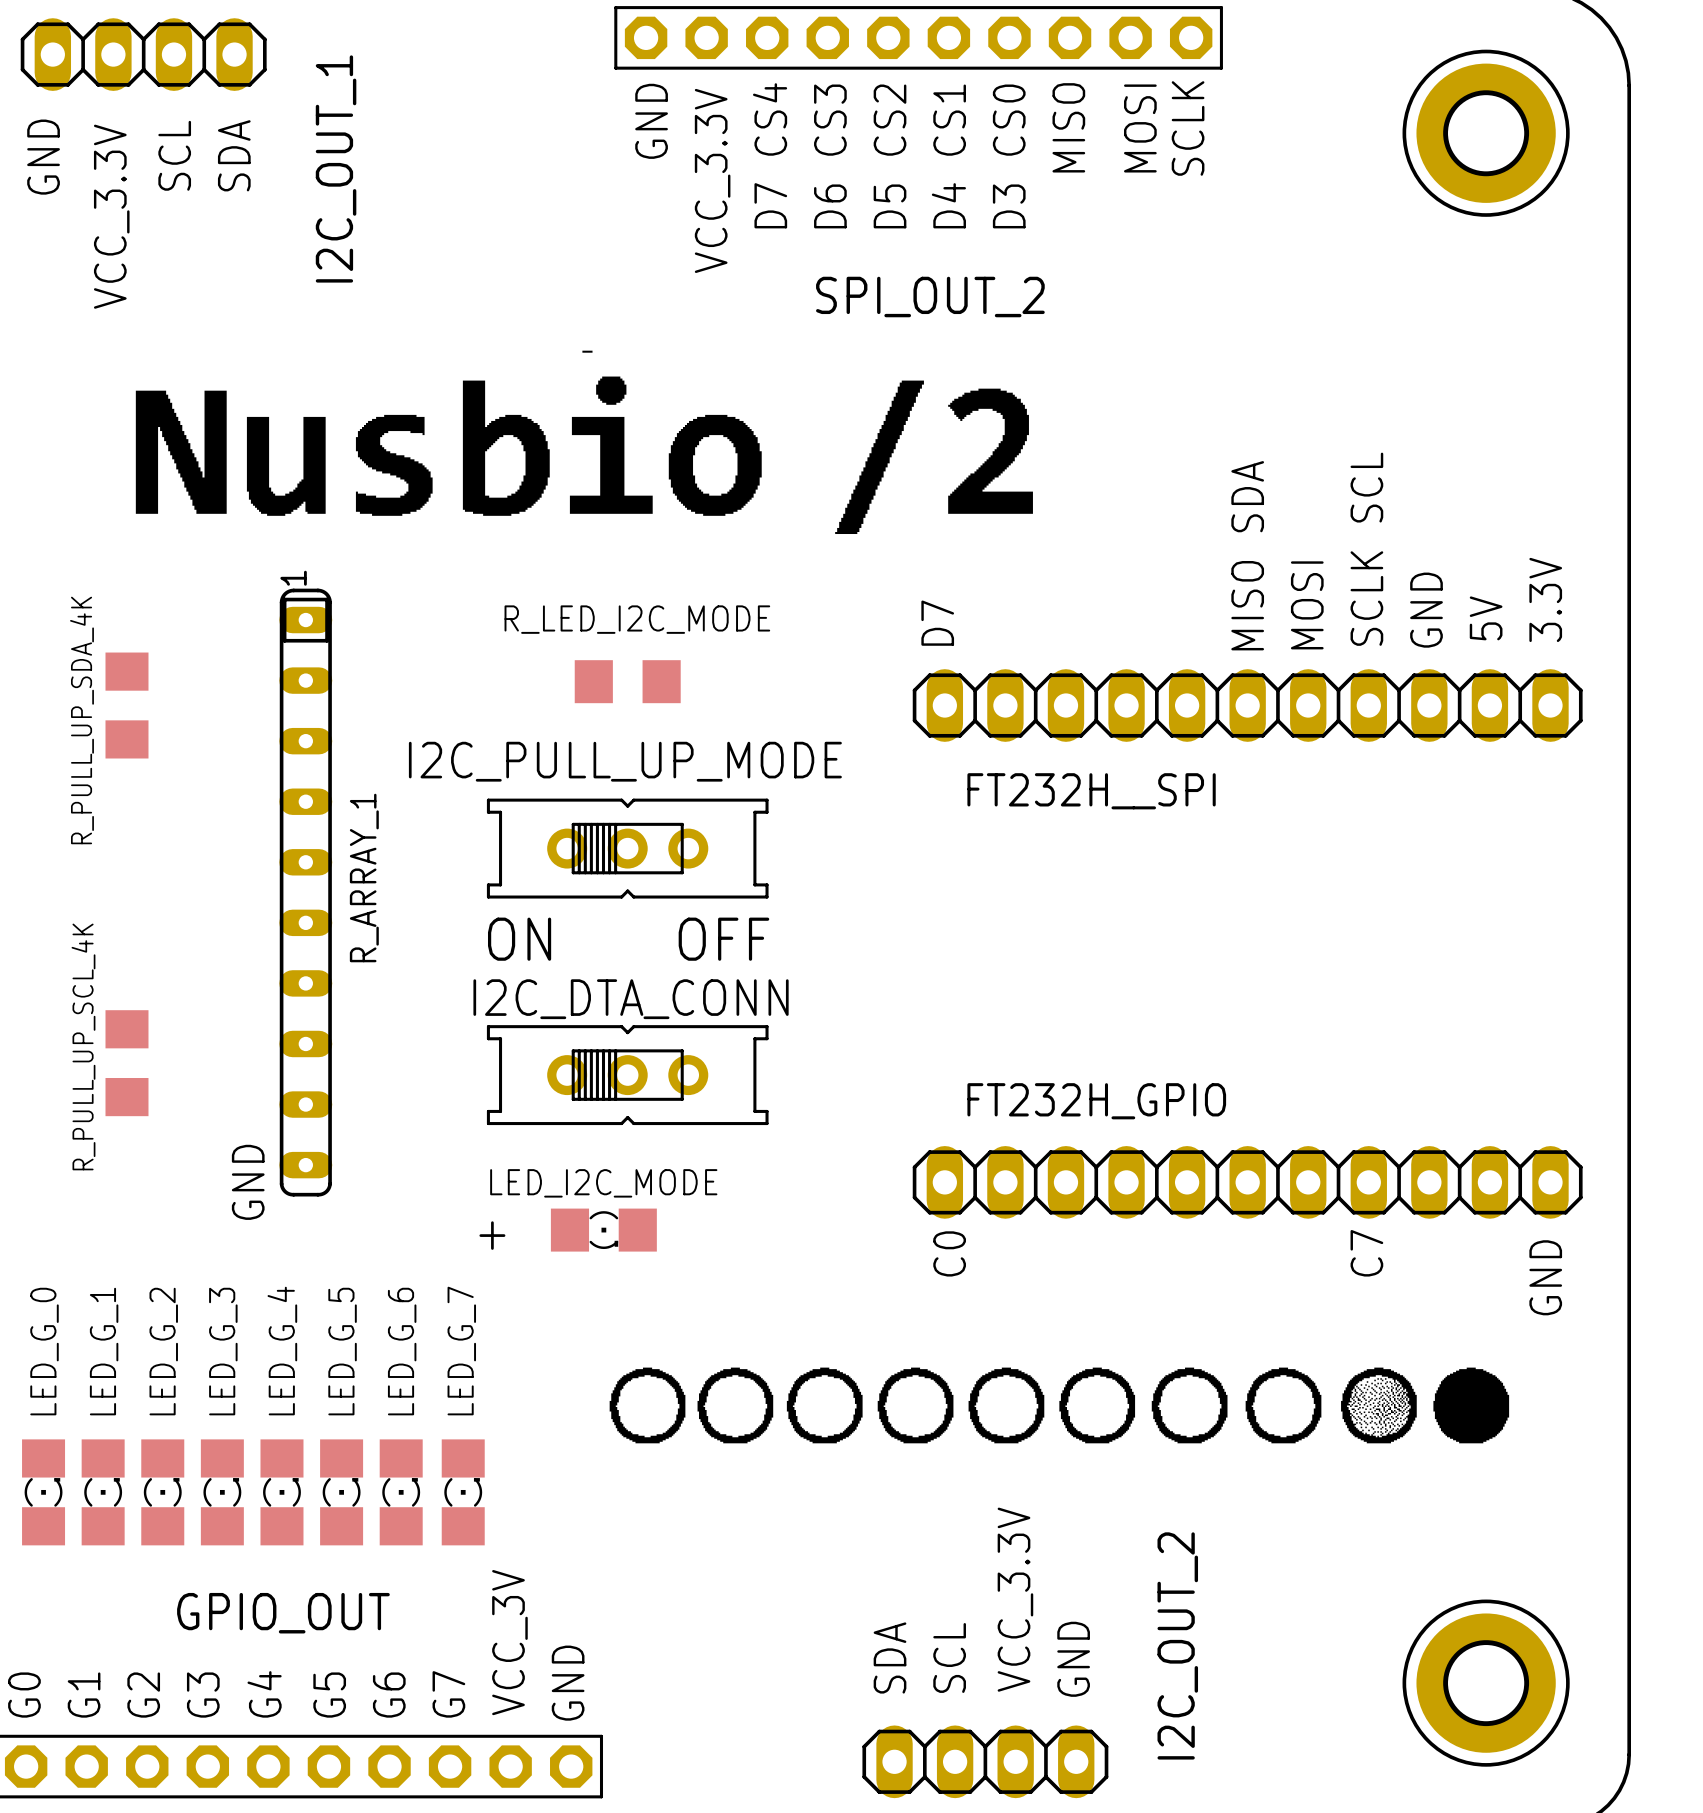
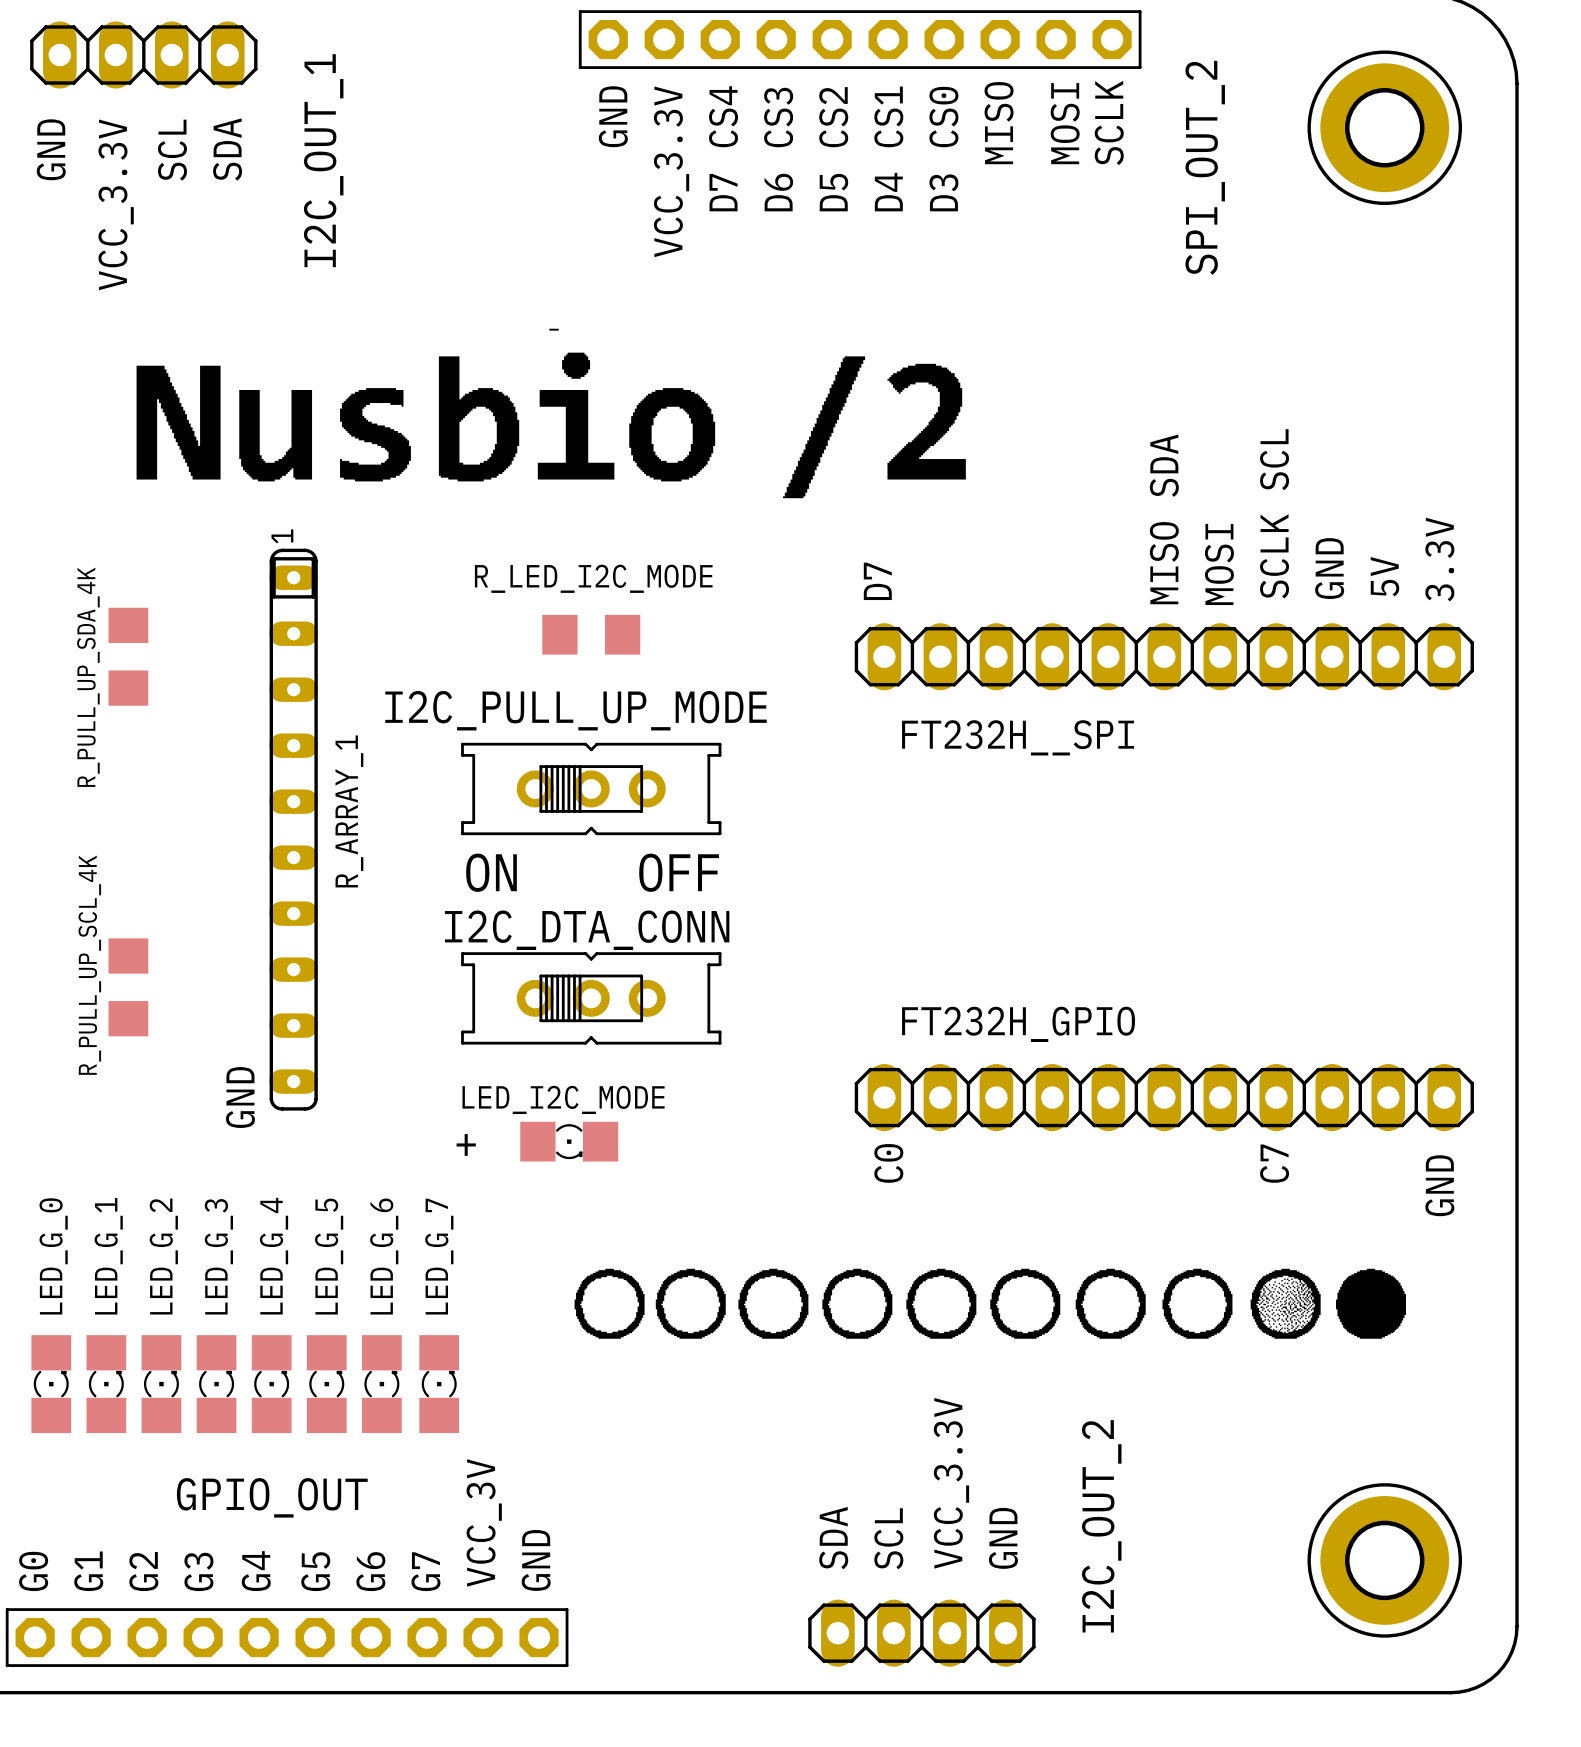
SPI_OUT_2 name rotation: 0° (930, 297) -> 90° counterclockwise (1205, 167)
SPI_OUT_2 name position: SPI_OUT_2 (930, 297) -> SPI_OUT_2 (1205, 167)

